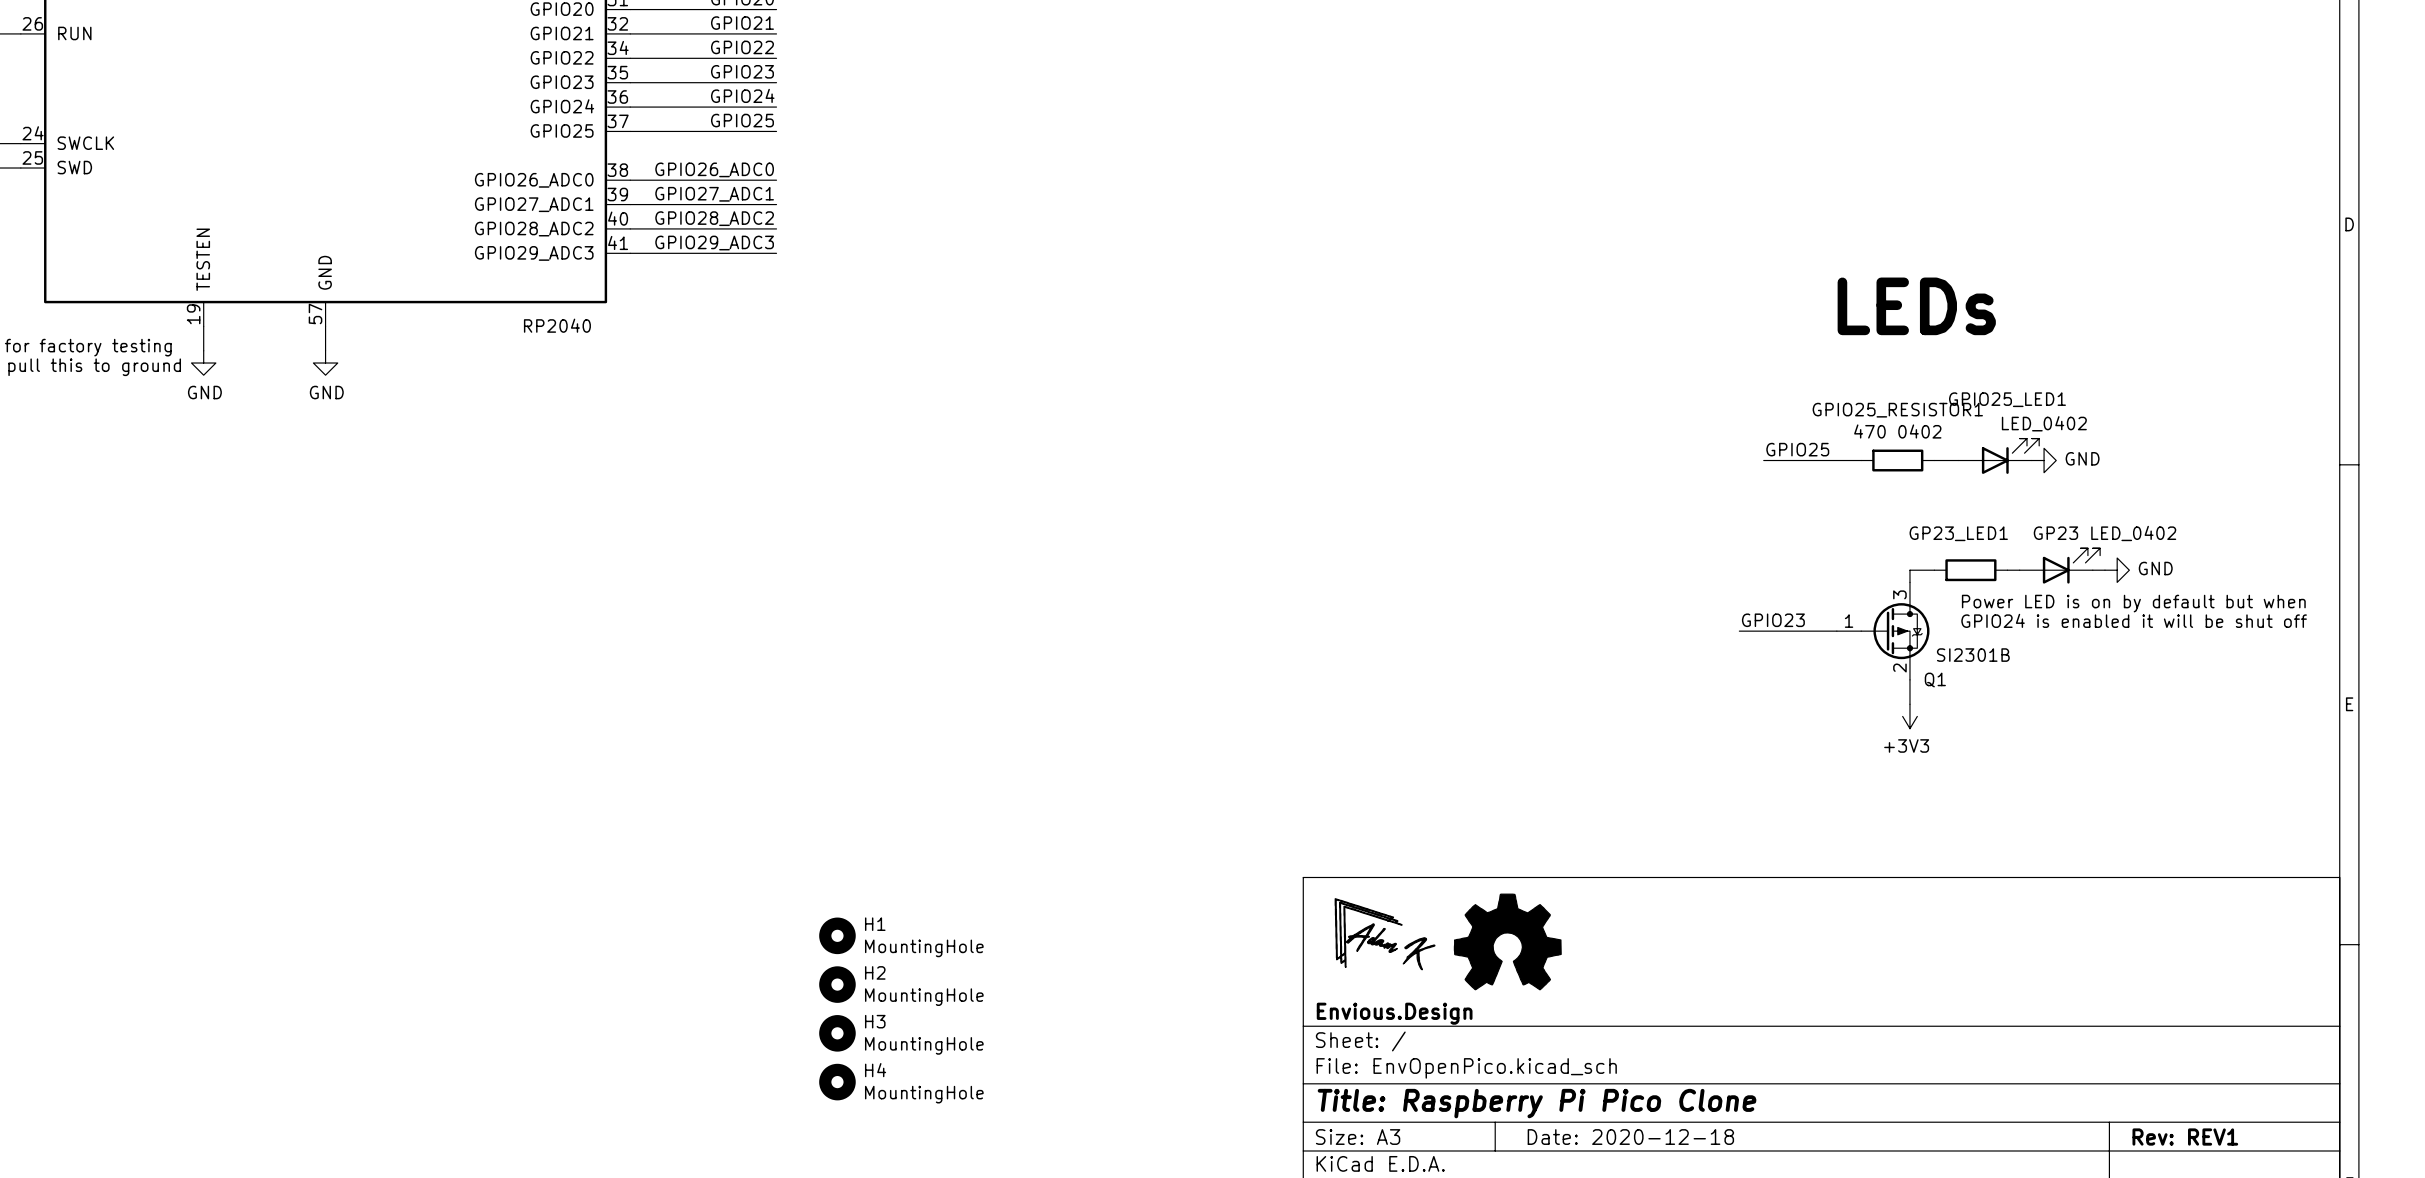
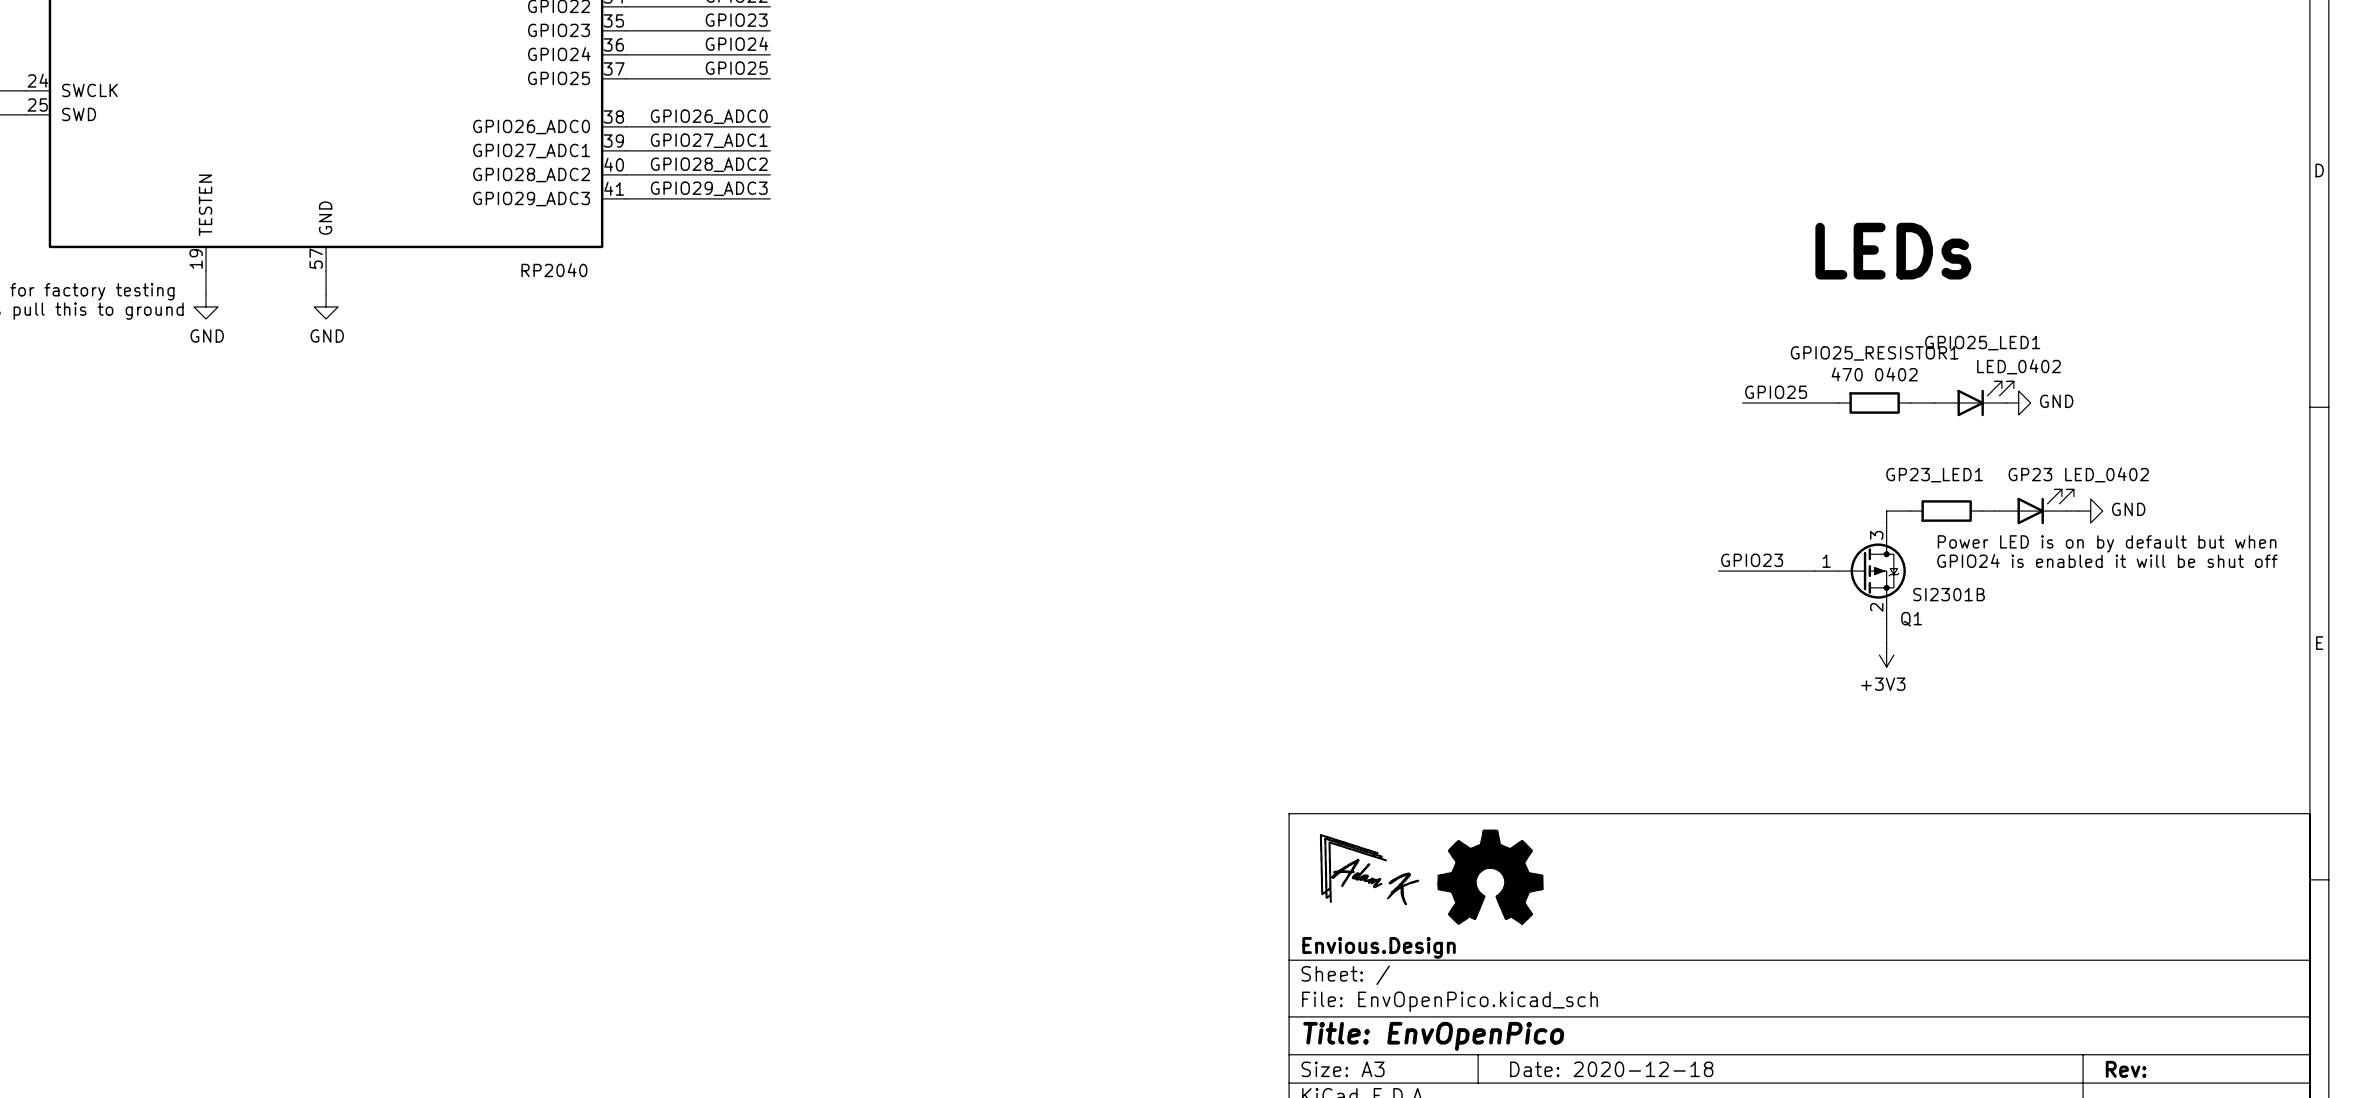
H1: MountingHole (837, 935) -> none
H2: MountingHole (837, 984) -> none
H3: MountingHole (837, 1033) -> none
H4: MountingHole (837, 1082) -> none
title block: Title: Raspberry Pi Pico Clone (1537, 1103) -> Title: EnvOpenPico (1433, 1036)
title block: Rev: REV1 (2185, 1137) -> Rev: (2126, 1069)

